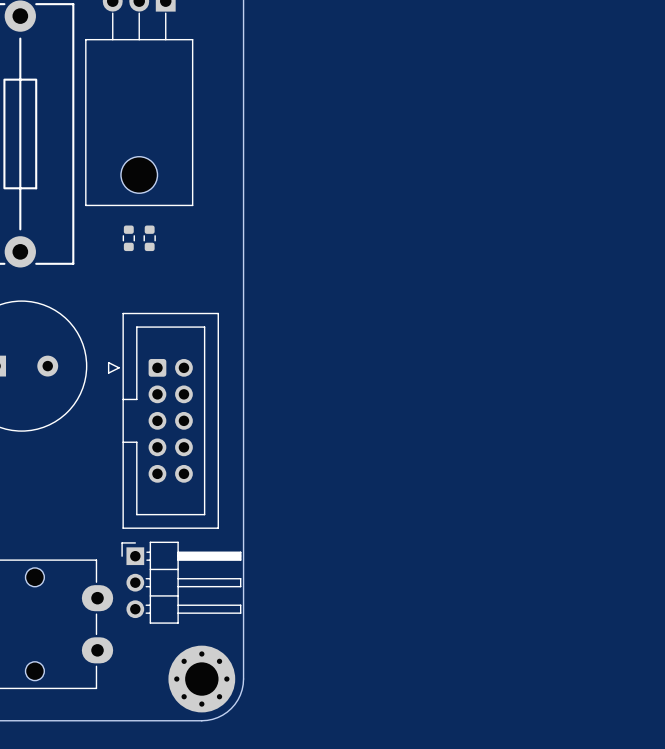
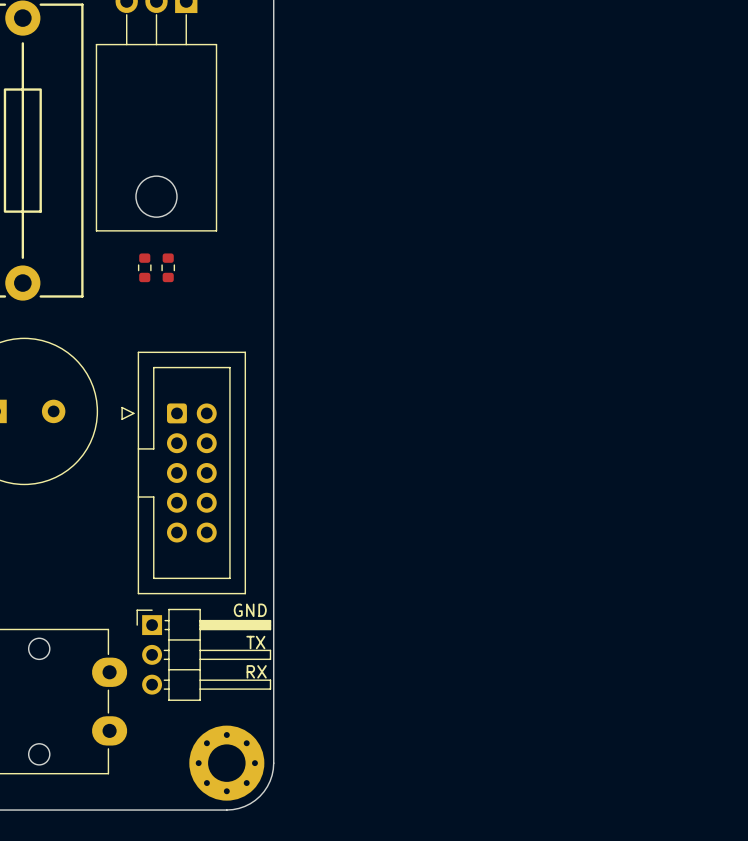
text: none -> GND (250, 610)
text: none -> TX (255, 642)
text: none -> RX (256, 671)

